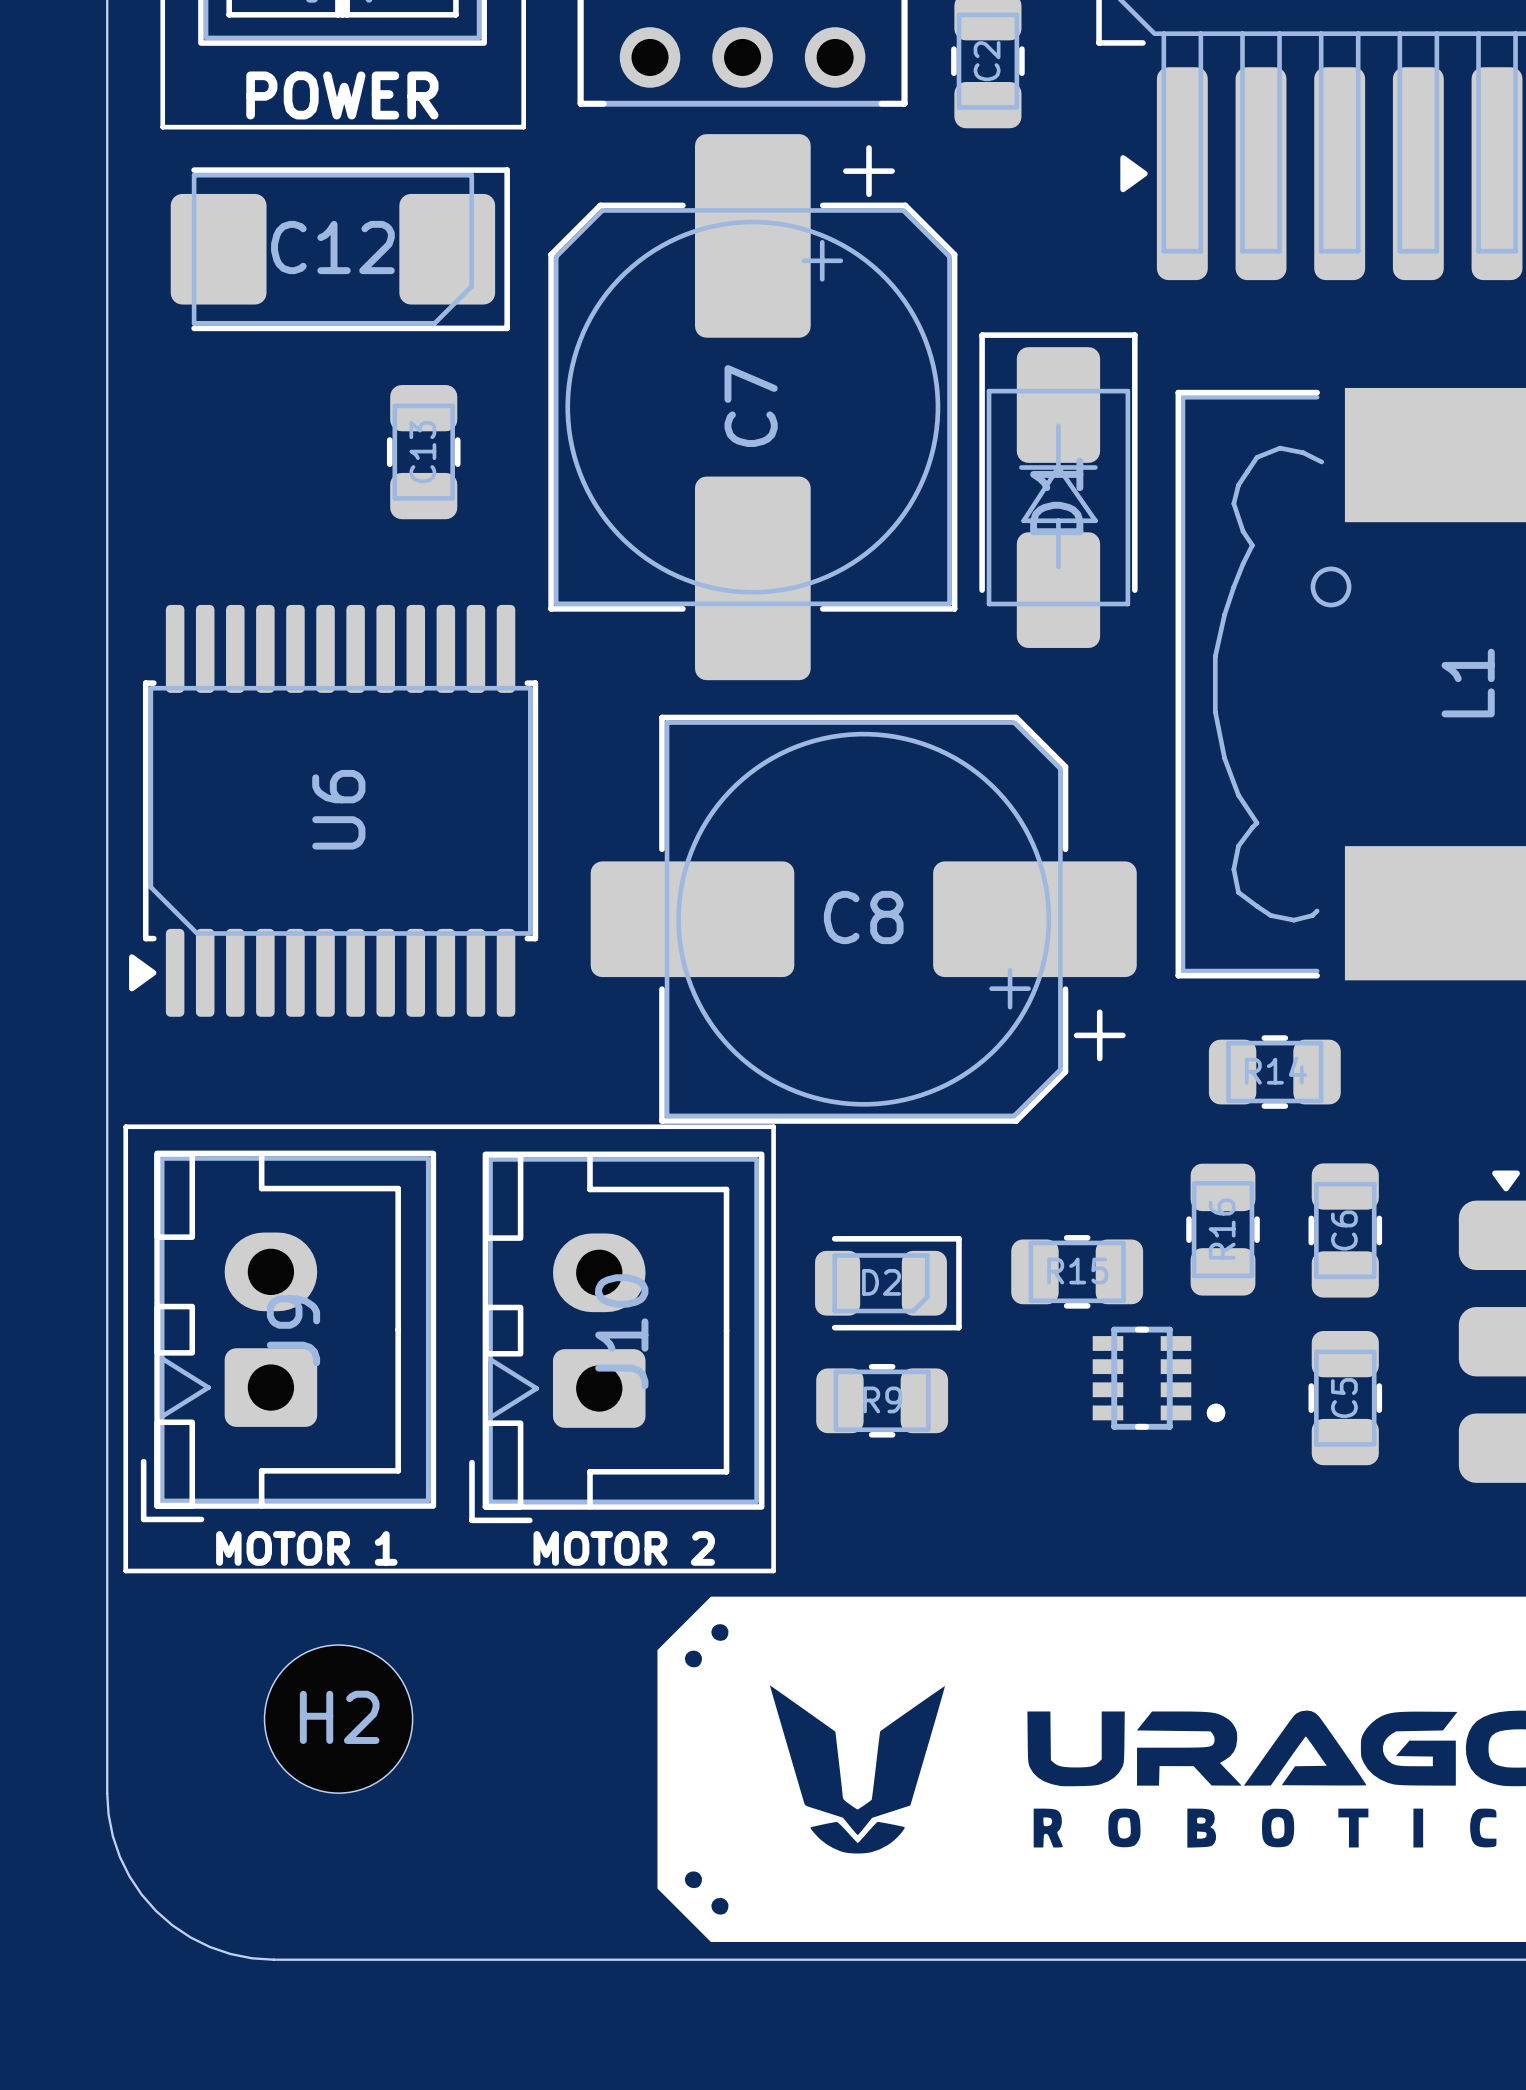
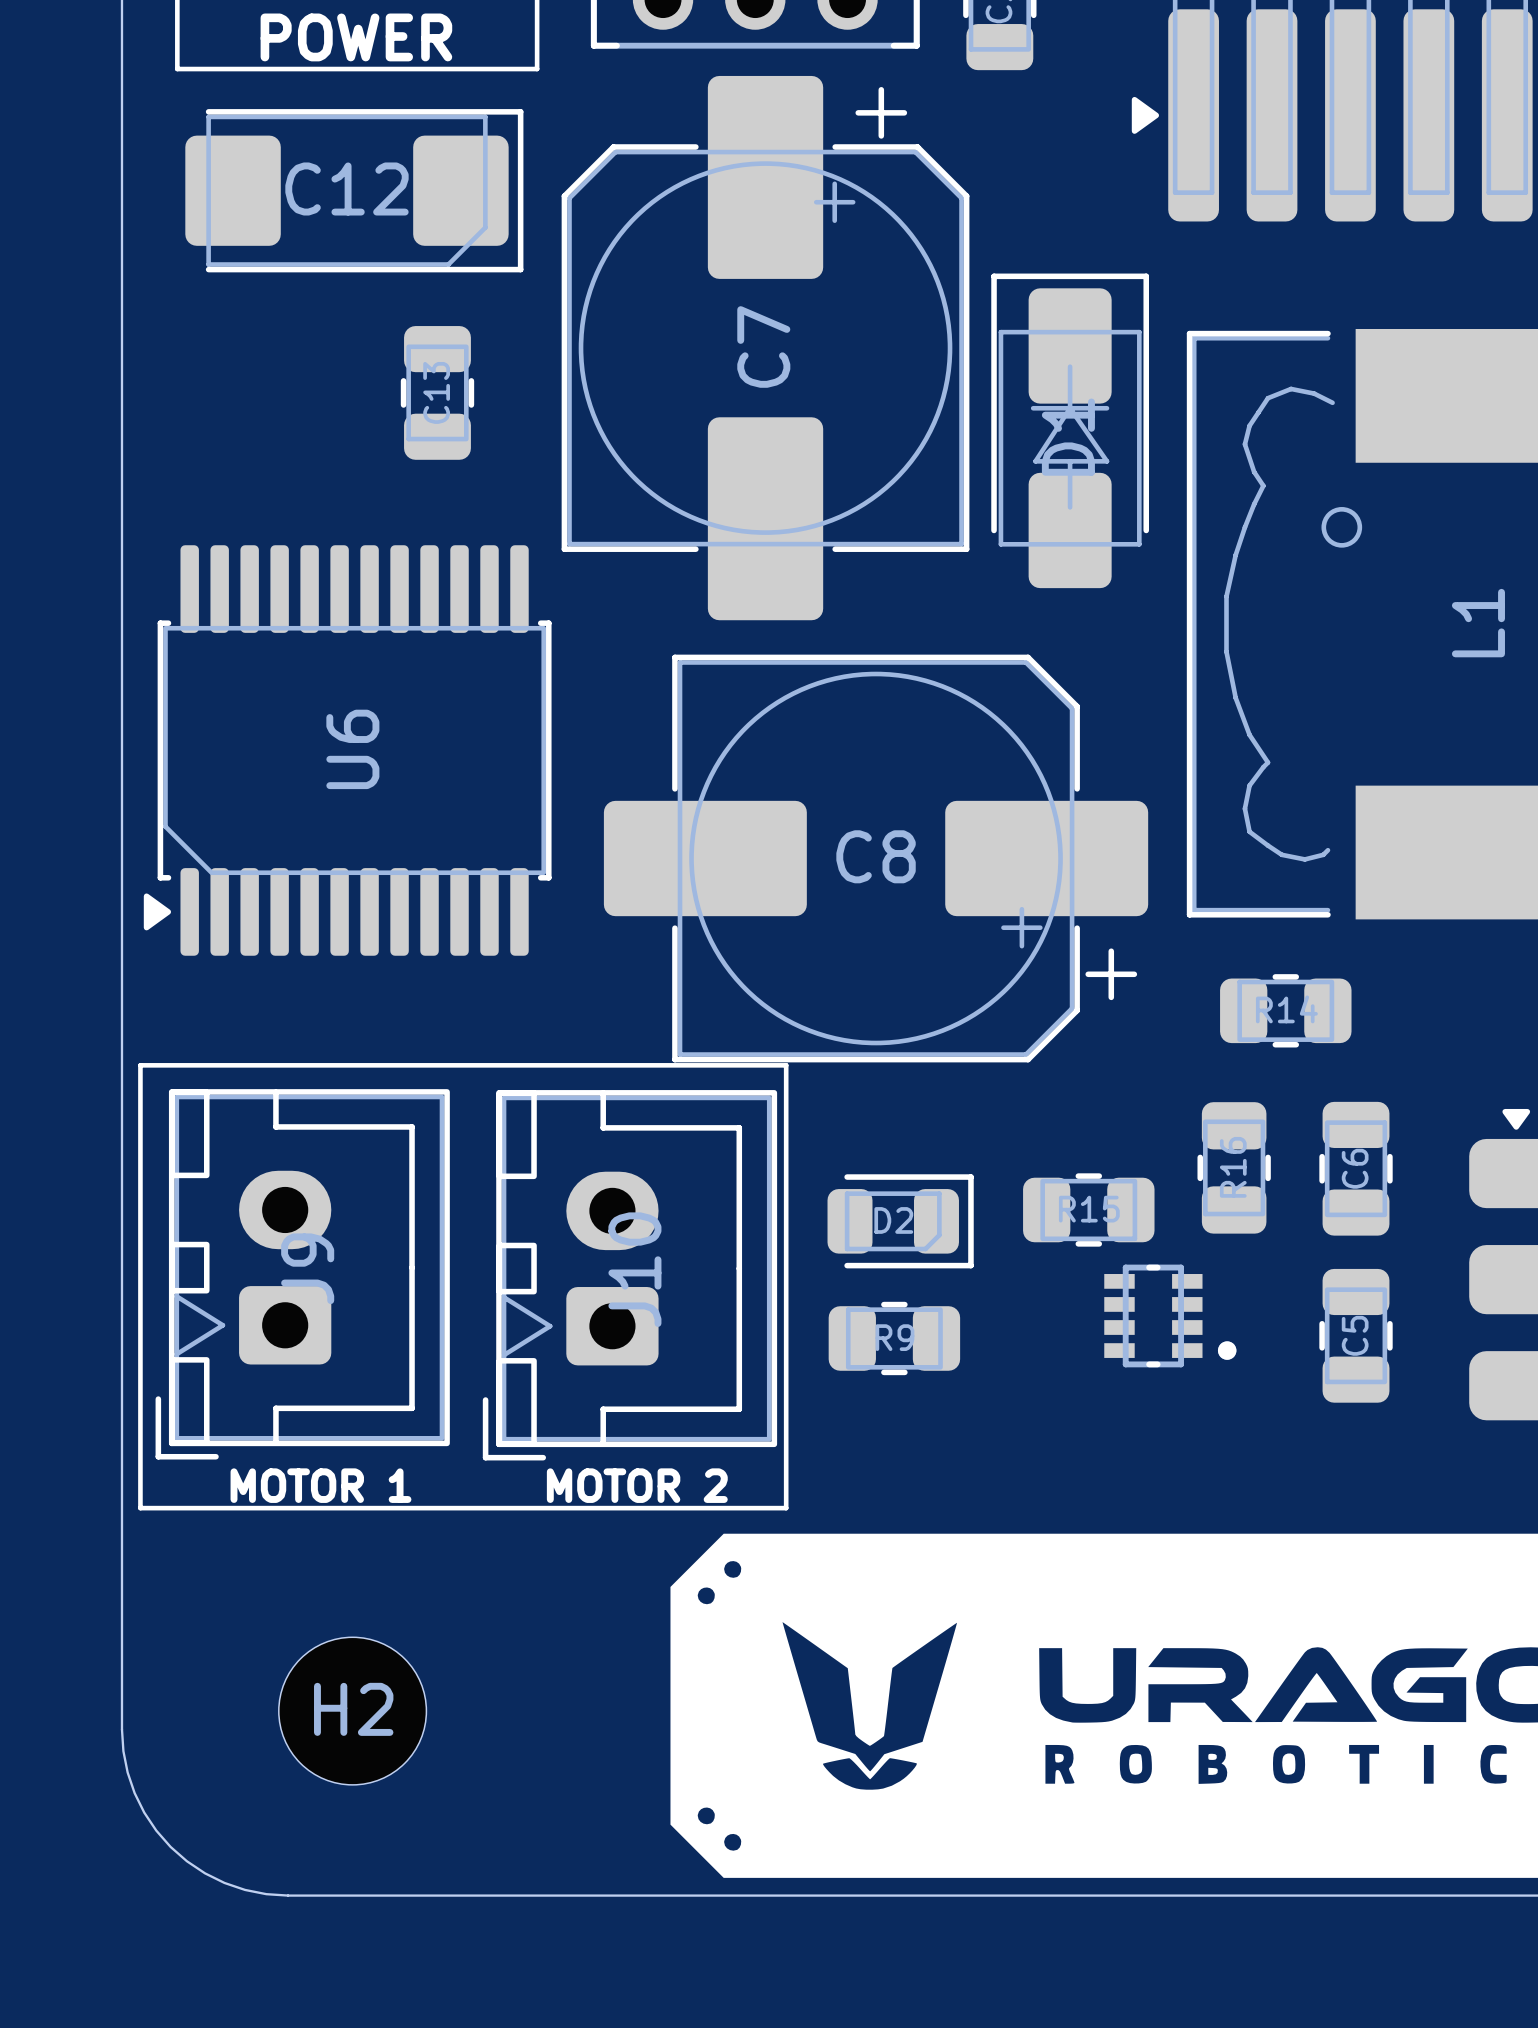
H2 position: (338, 1719) -> (352, 1711)

